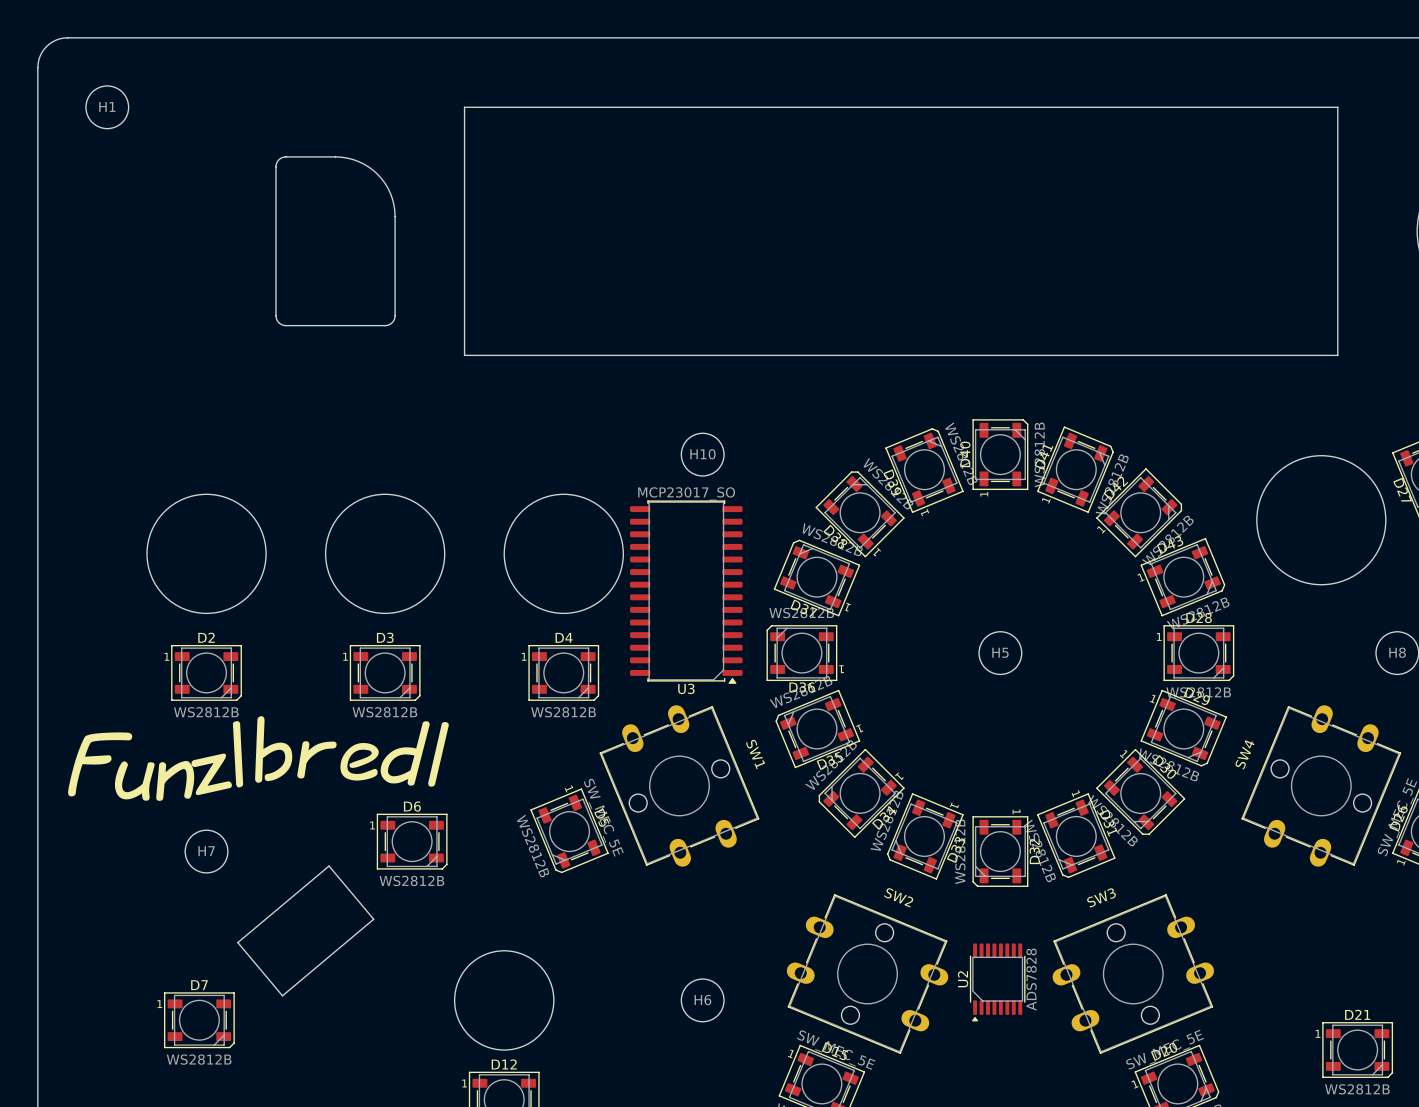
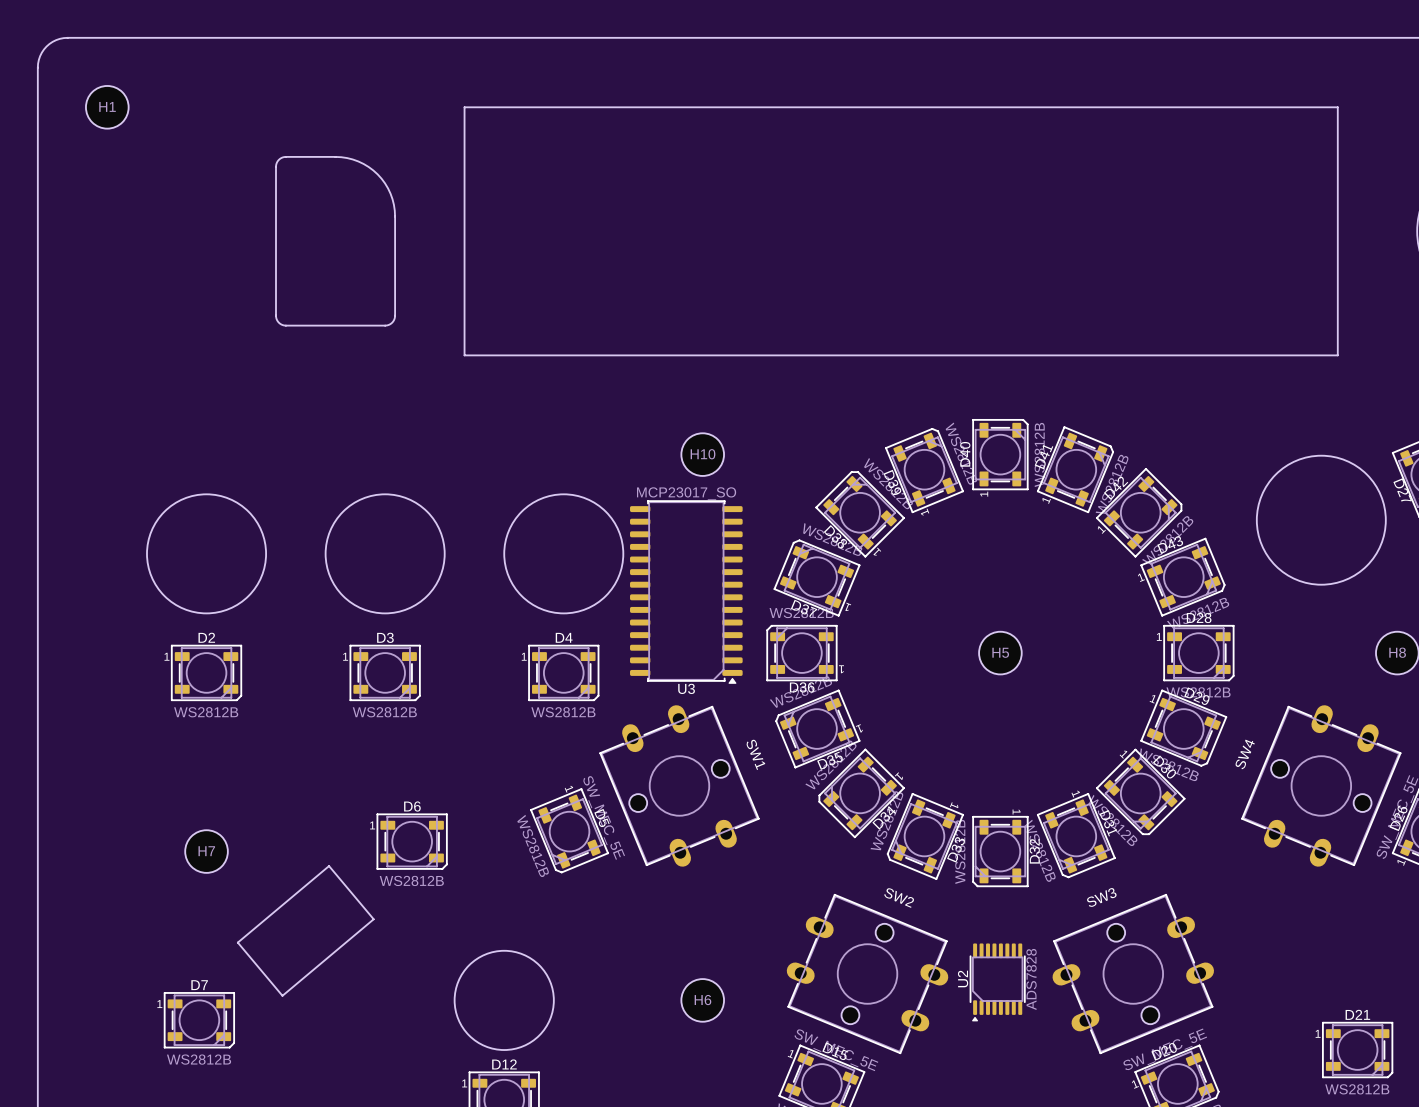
drawing: [255, 716, 449, 787] -> none
drawing: [68, 721, 244, 801] -> none

